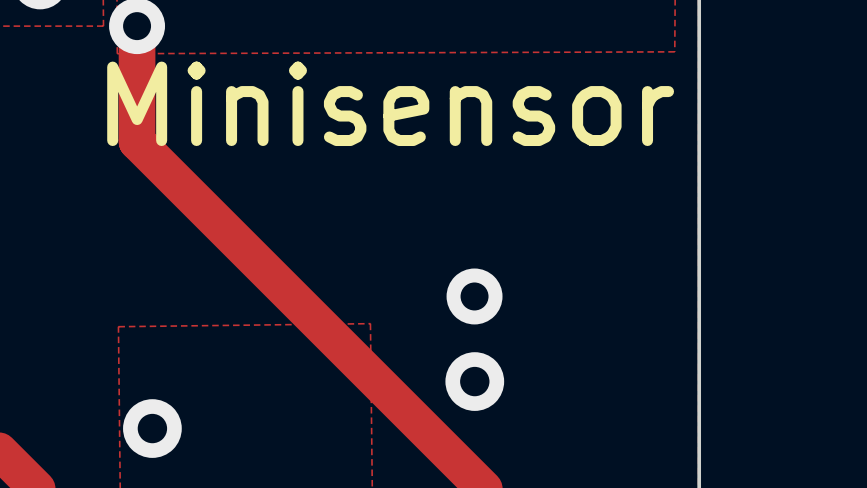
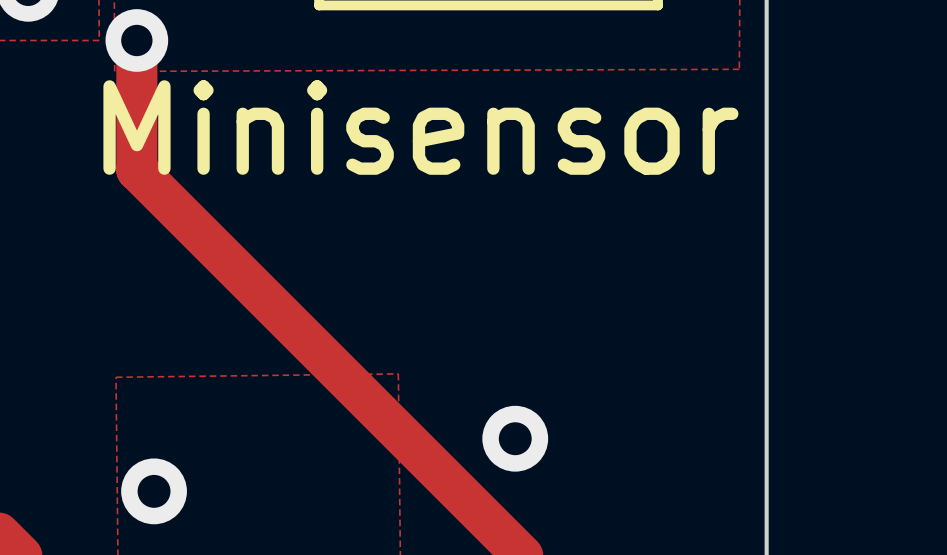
via: (474, 296) -> none

